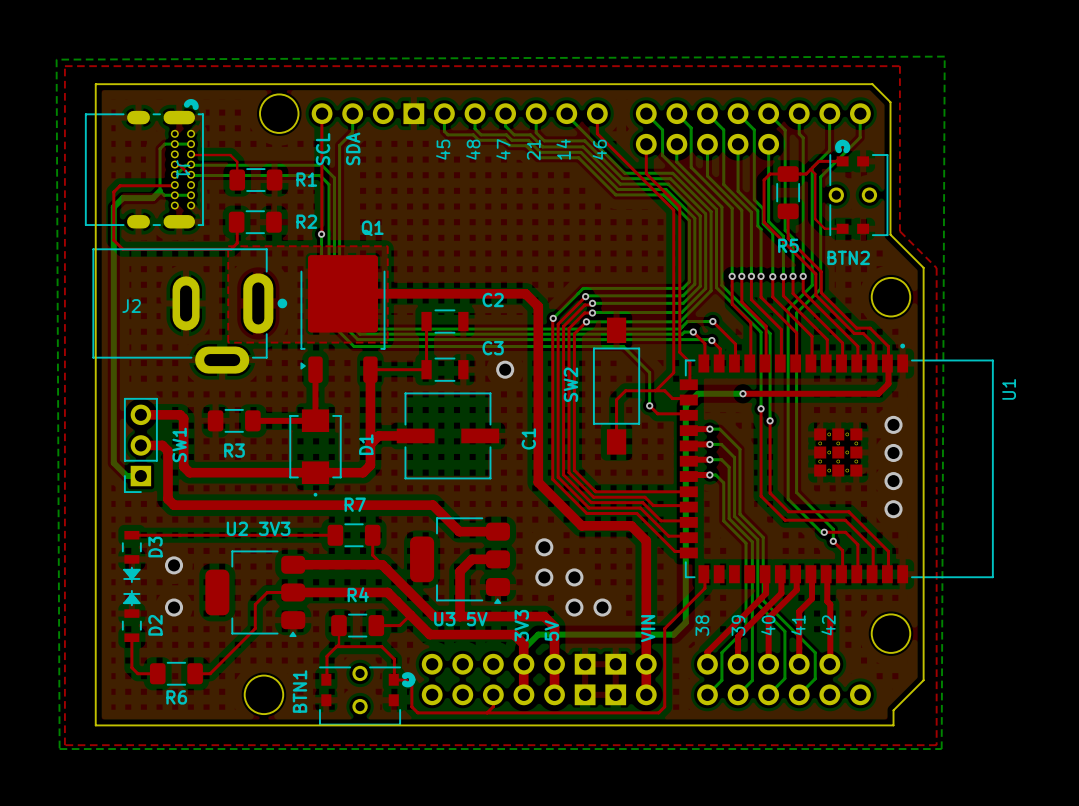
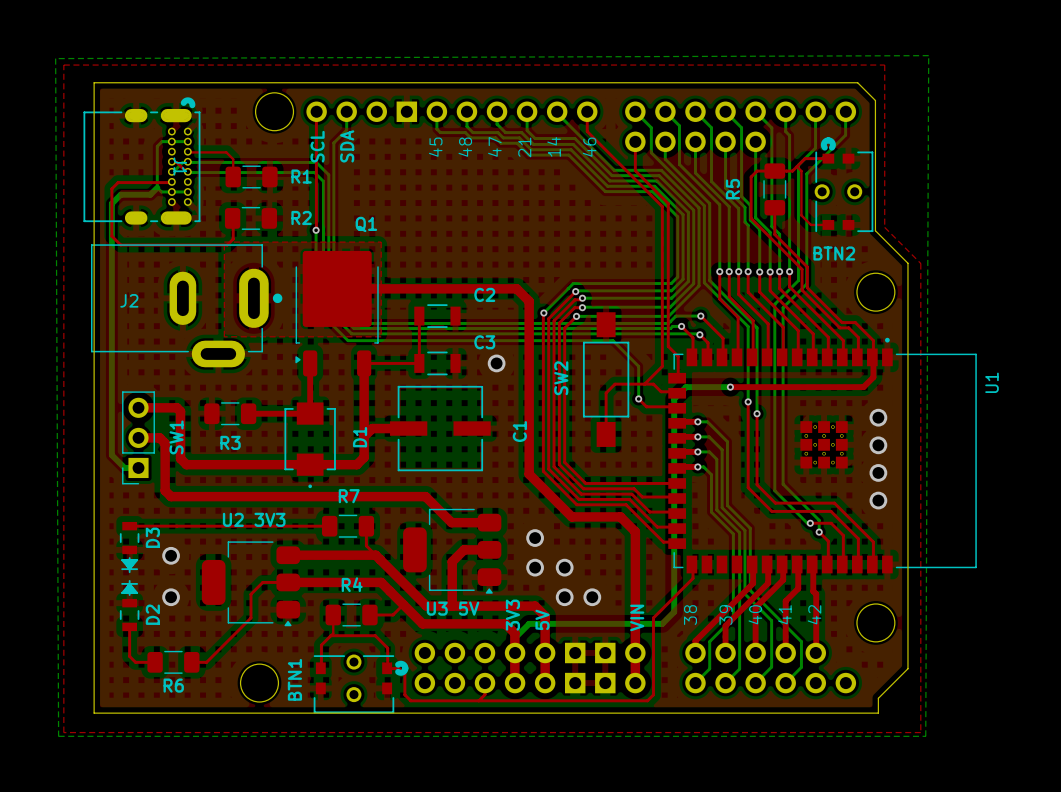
R5 name rotation: 0° (788, 245) -> 90° counterclockwise (732, 189)
R5 name position: R5 (788, 245) -> R5 (732, 189)

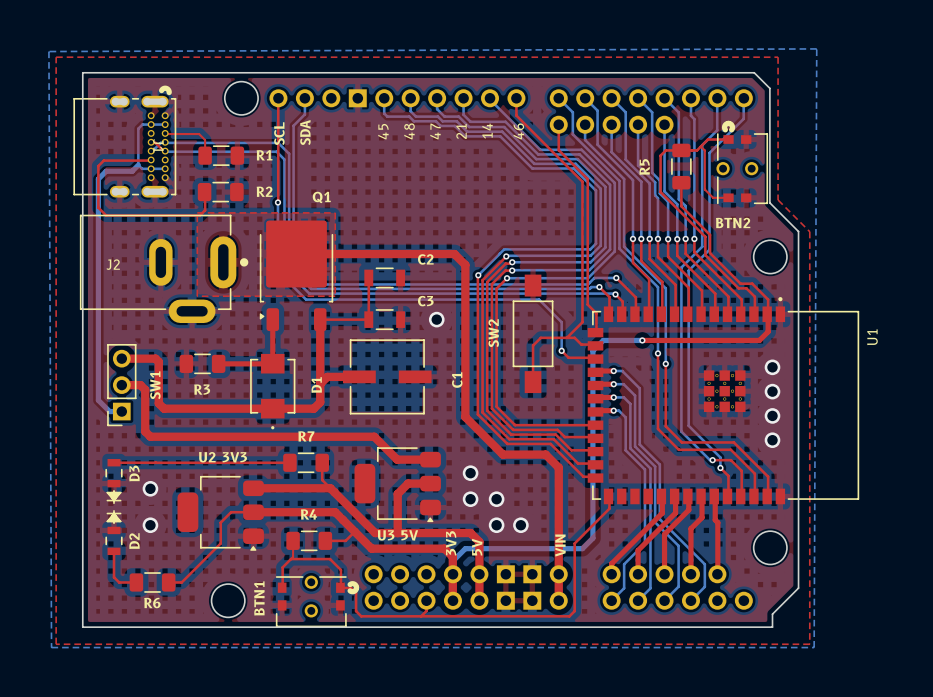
text: 40 (755, 614) -> none
text: 41 (784, 614) -> none
text: 42 (814, 614) -> none
text: 38 (690, 615) -> none
text: 39 (726, 615) -> none

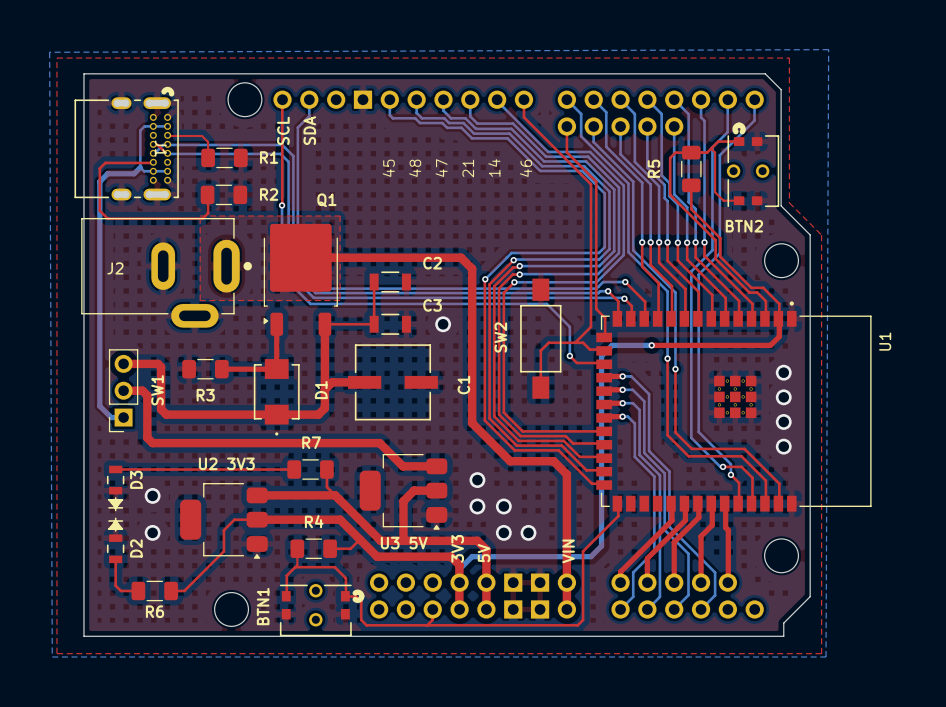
text position: 45 (383, 131) -> 45 (388, 168)
text position: 48 (409, 131) -> 48 (415, 168)
text position: 47 (435, 131) -> 47 (441, 168)
text position: 21 (461, 131) -> 21 (468, 168)
text position: 14 (487, 131) -> 14 (494, 168)
text position: 46 (518, 131) -> 46 (526, 168)

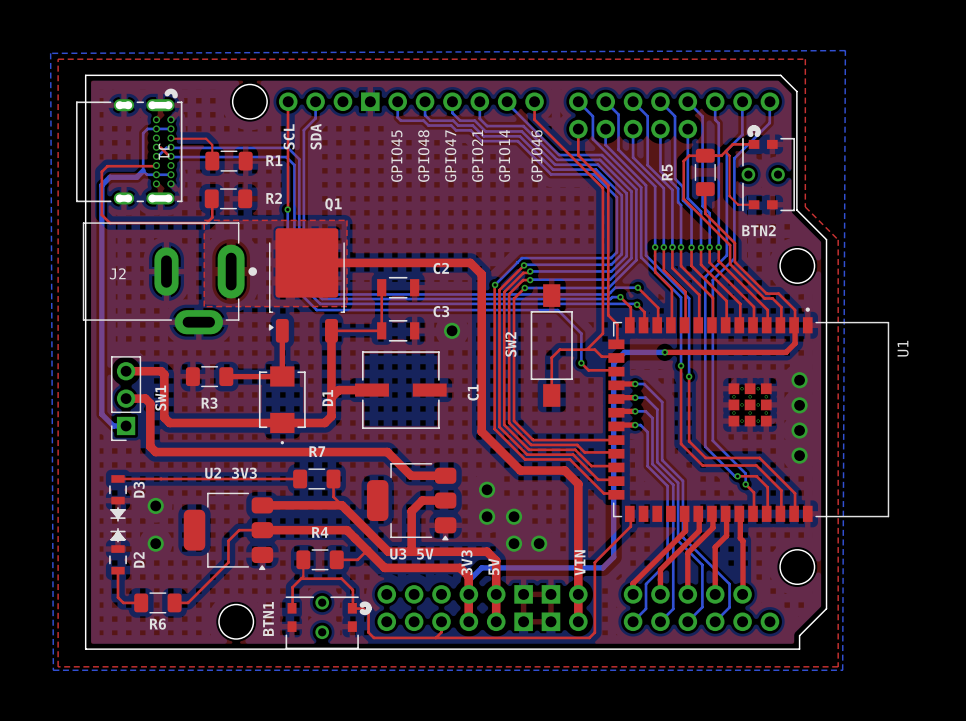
text: 45 (388, 168) -> GPIO45 (396, 156)
text: 48 (415, 168) -> GPIO48 (423, 156)
text: 47 (441, 168) -> GPIO47 (450, 156)
text: 21 (468, 168) -> GPIO21 (477, 156)
text: 14 (494, 168) -> GPIO14 (504, 155)
text: 46 (526, 168) -> GPIO46 (536, 156)

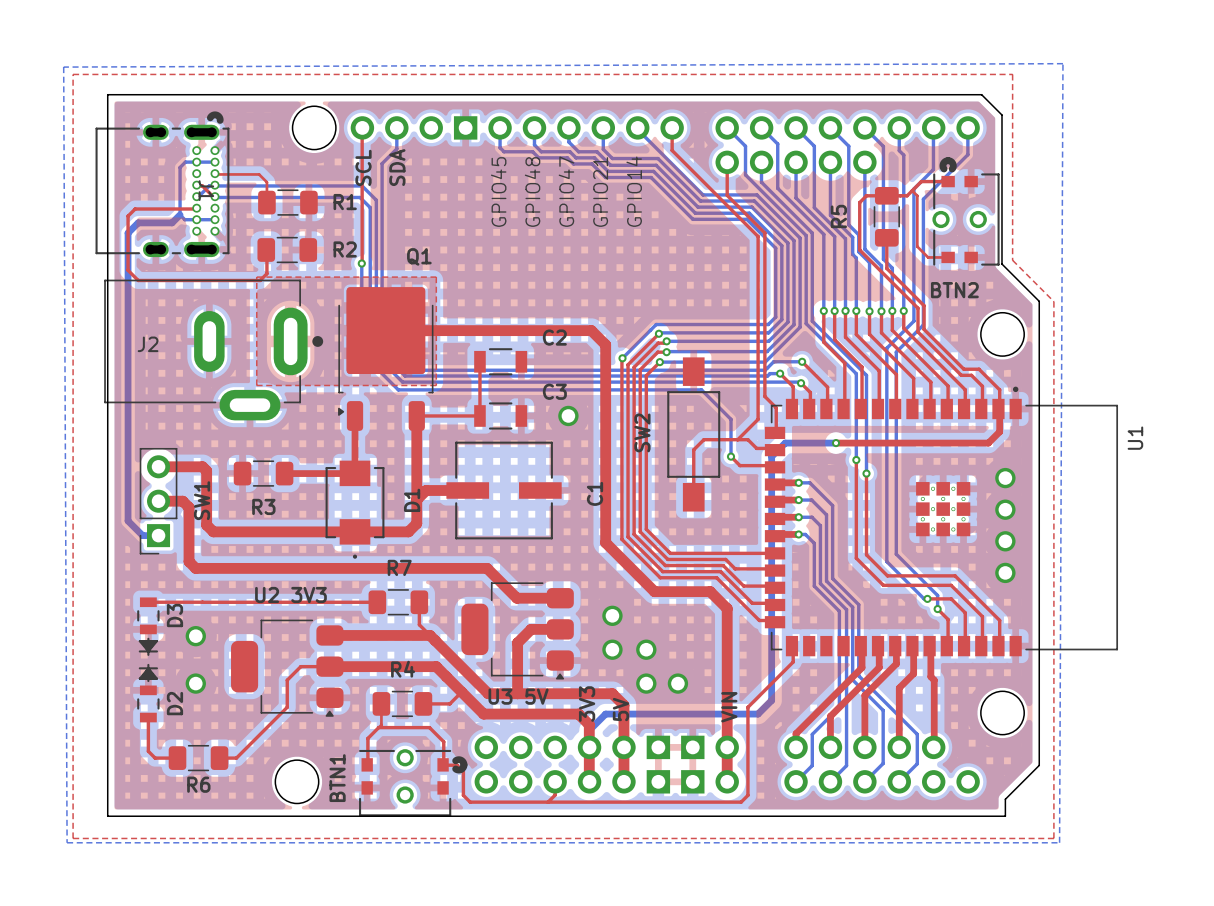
text: GPIO46 (536, 156) -> none

